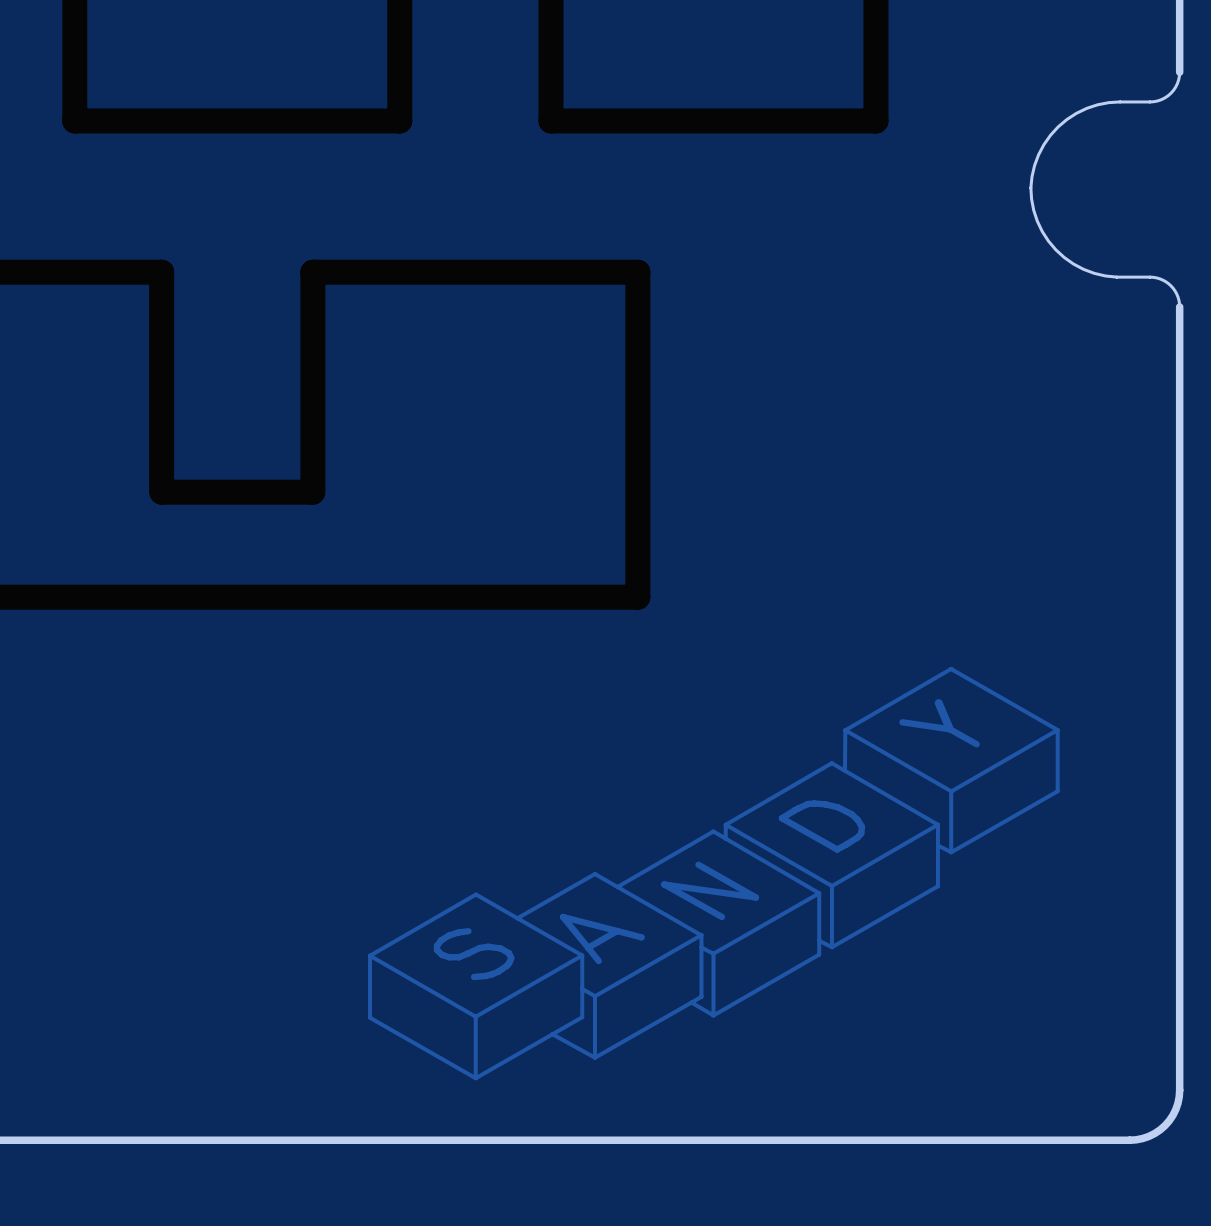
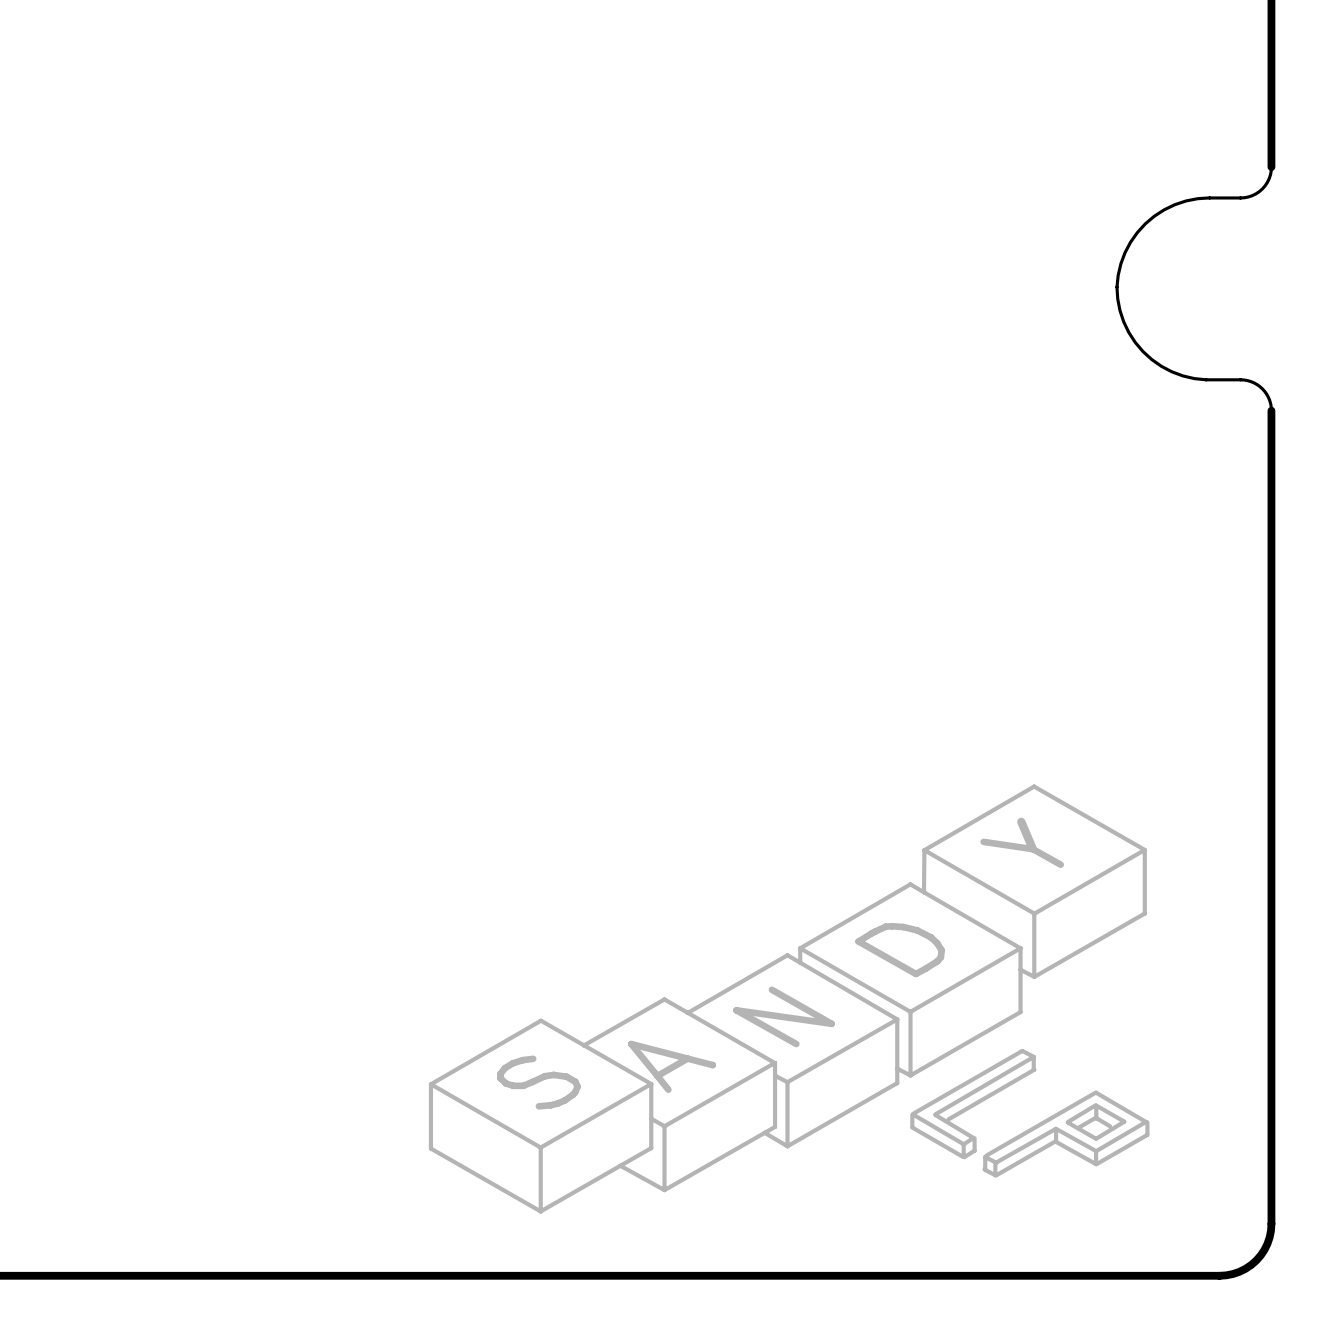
track: none -> (1033, 1056) (1022, 1050) (912, 1113)
track: none -> (1033, 1056) (1034, 1069) (948, 1119)
track: none -> (1033, 1056) (935, 1114)
track: none -> (1096, 1092) (986, 1155)
track: none -> (1096, 1093) (1145, 1121) (1096, 1150)
track: none -> (1095, 1105) (1067, 1122)
track: none -> (1096, 1106) (1096, 1118)
track: none -> (1096, 1105) (1124, 1121) (1096, 1138)
track: none -> (912, 1115) (912, 1127)
track: none -> (913, 1114) (963, 1143)
track: none -> (935, 1115) (973, 1137) (963, 1144) (963, 1156)
track: none -> (1096, 1117) (1079, 1127)
track: none -> (1095, 1117) (1110, 1126)
track: none -> (1068, 1122) (1095, 1138)
track: none -> (1147, 1122) (1147, 1134)
track: none -> (912, 1127) (963, 1156)
track: none -> (1055, 1128) (996, 1162)
track: none -> (1055, 1128) (1095, 1150)
track: none -> (1056, 1129) (1056, 1142)
track: none -> (1147, 1134) (1096, 1164)
track: none -> (974, 1138) (974, 1150) (964, 1157)
track: none -> (1055, 1141) (996, 1175)
track: none -> (1056, 1142) (1096, 1164) (1096, 1151)
track: none -> (995, 1162) (995, 1175)
track: none -> (996, 1162) (985, 1157) (985, 1169)
track: none -> (984, 1169) (995, 1175)

